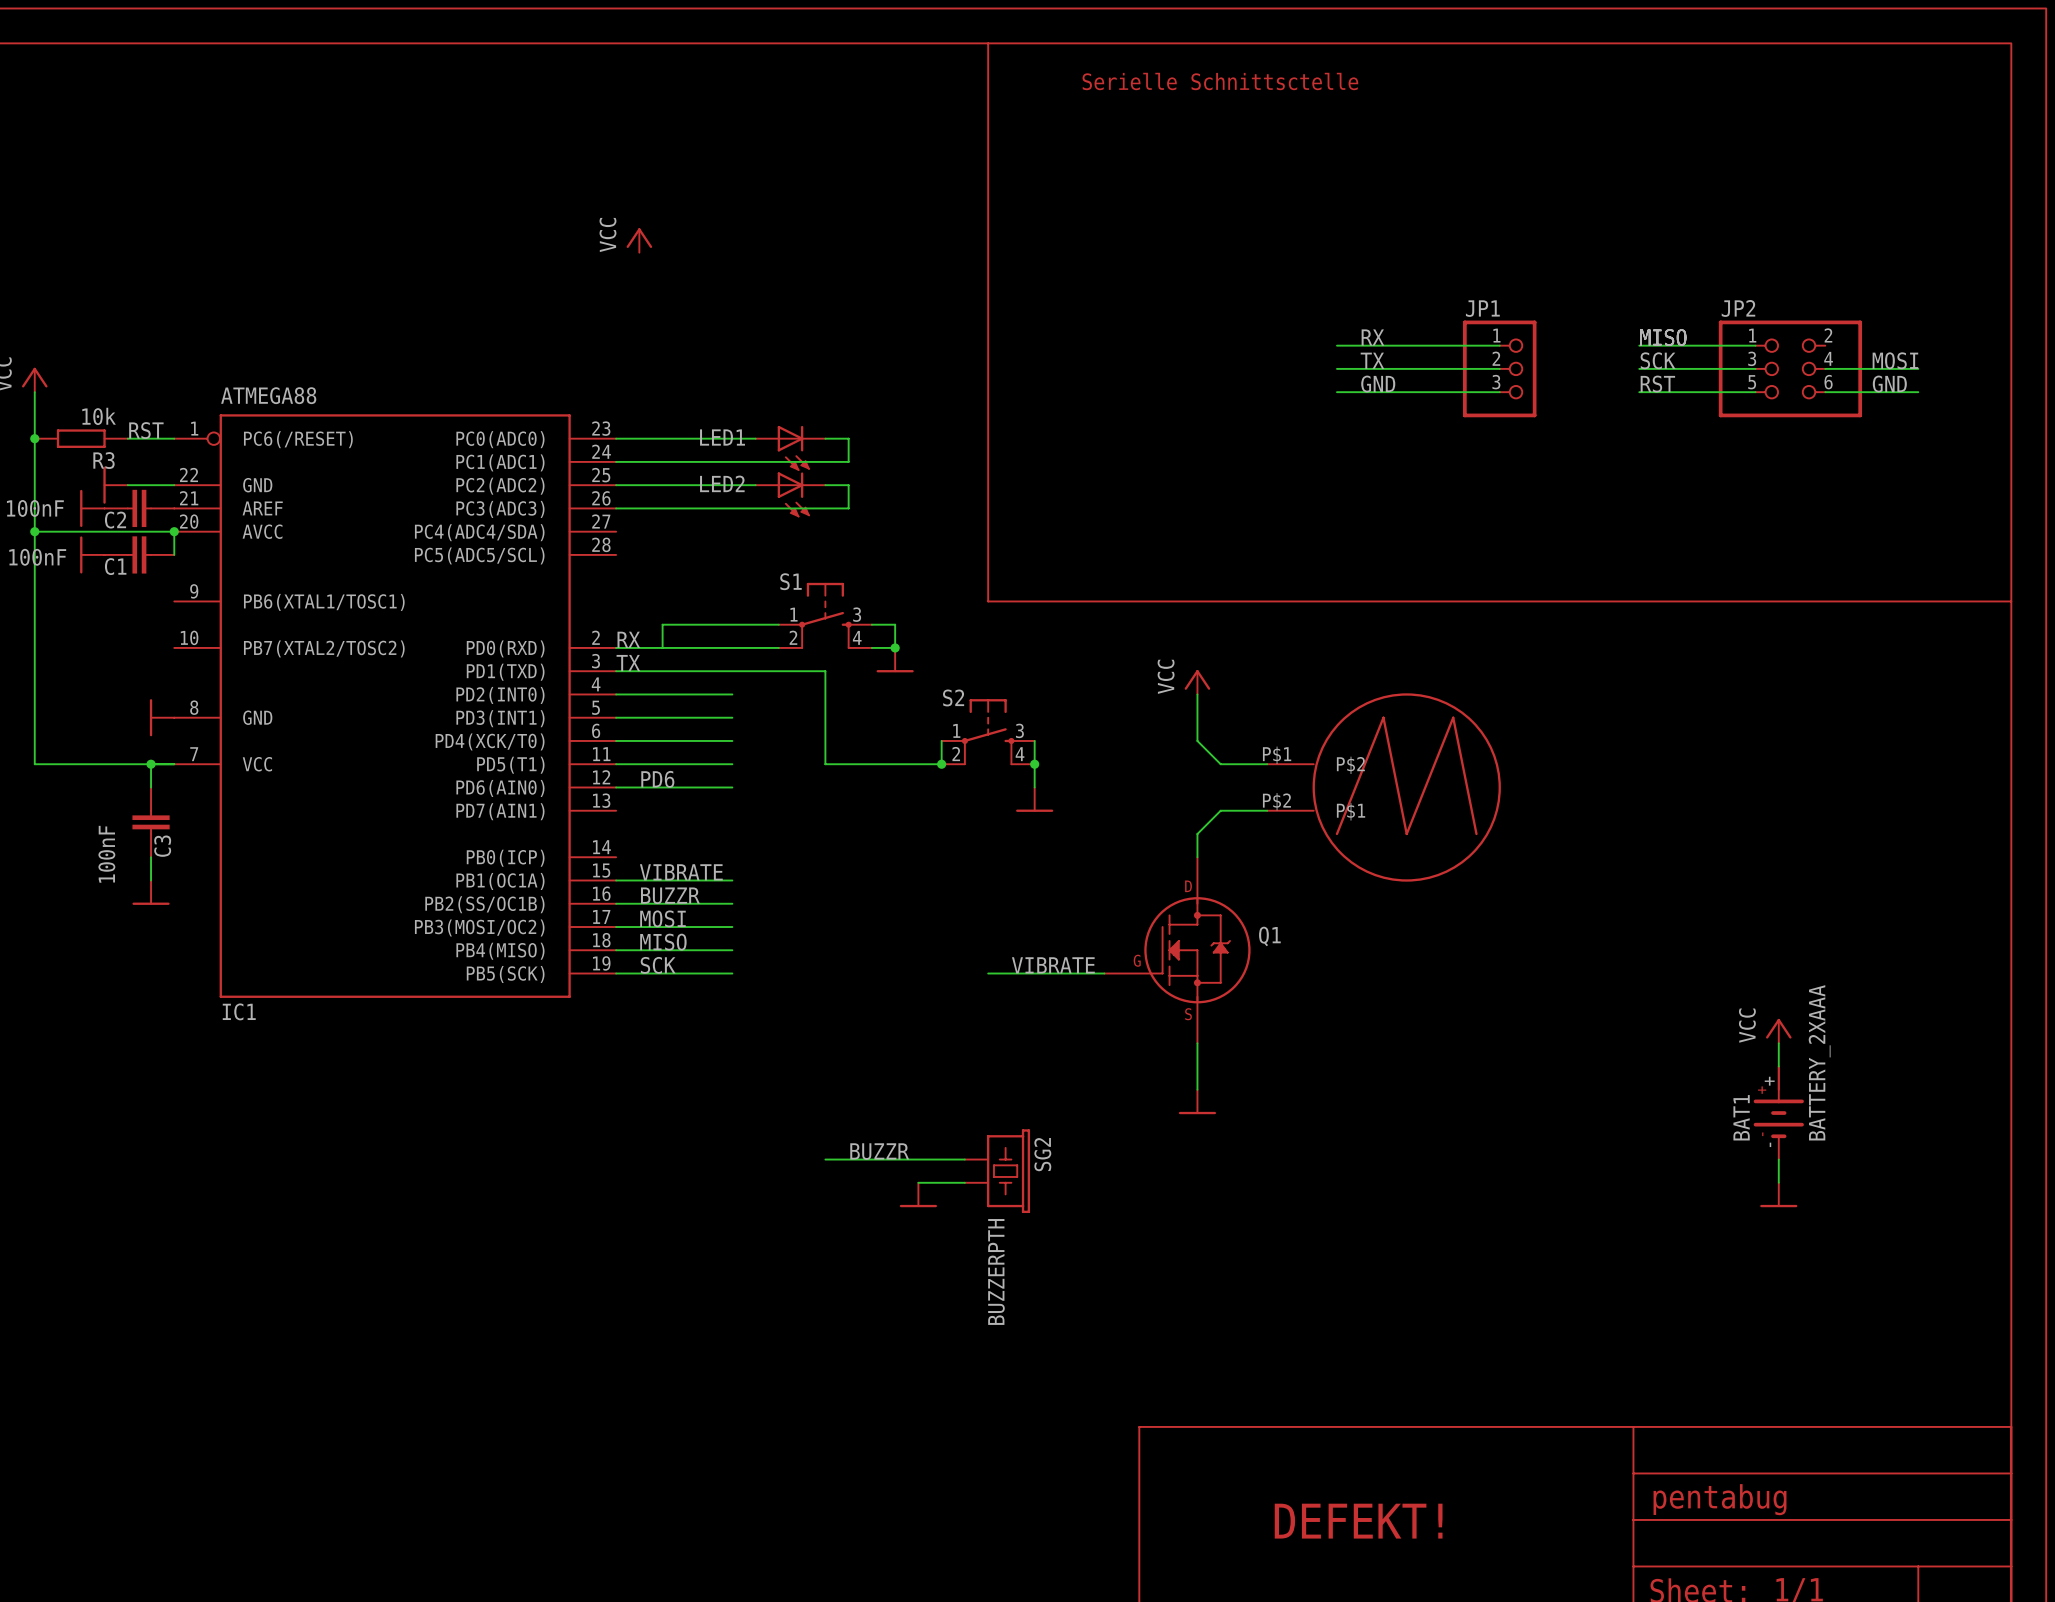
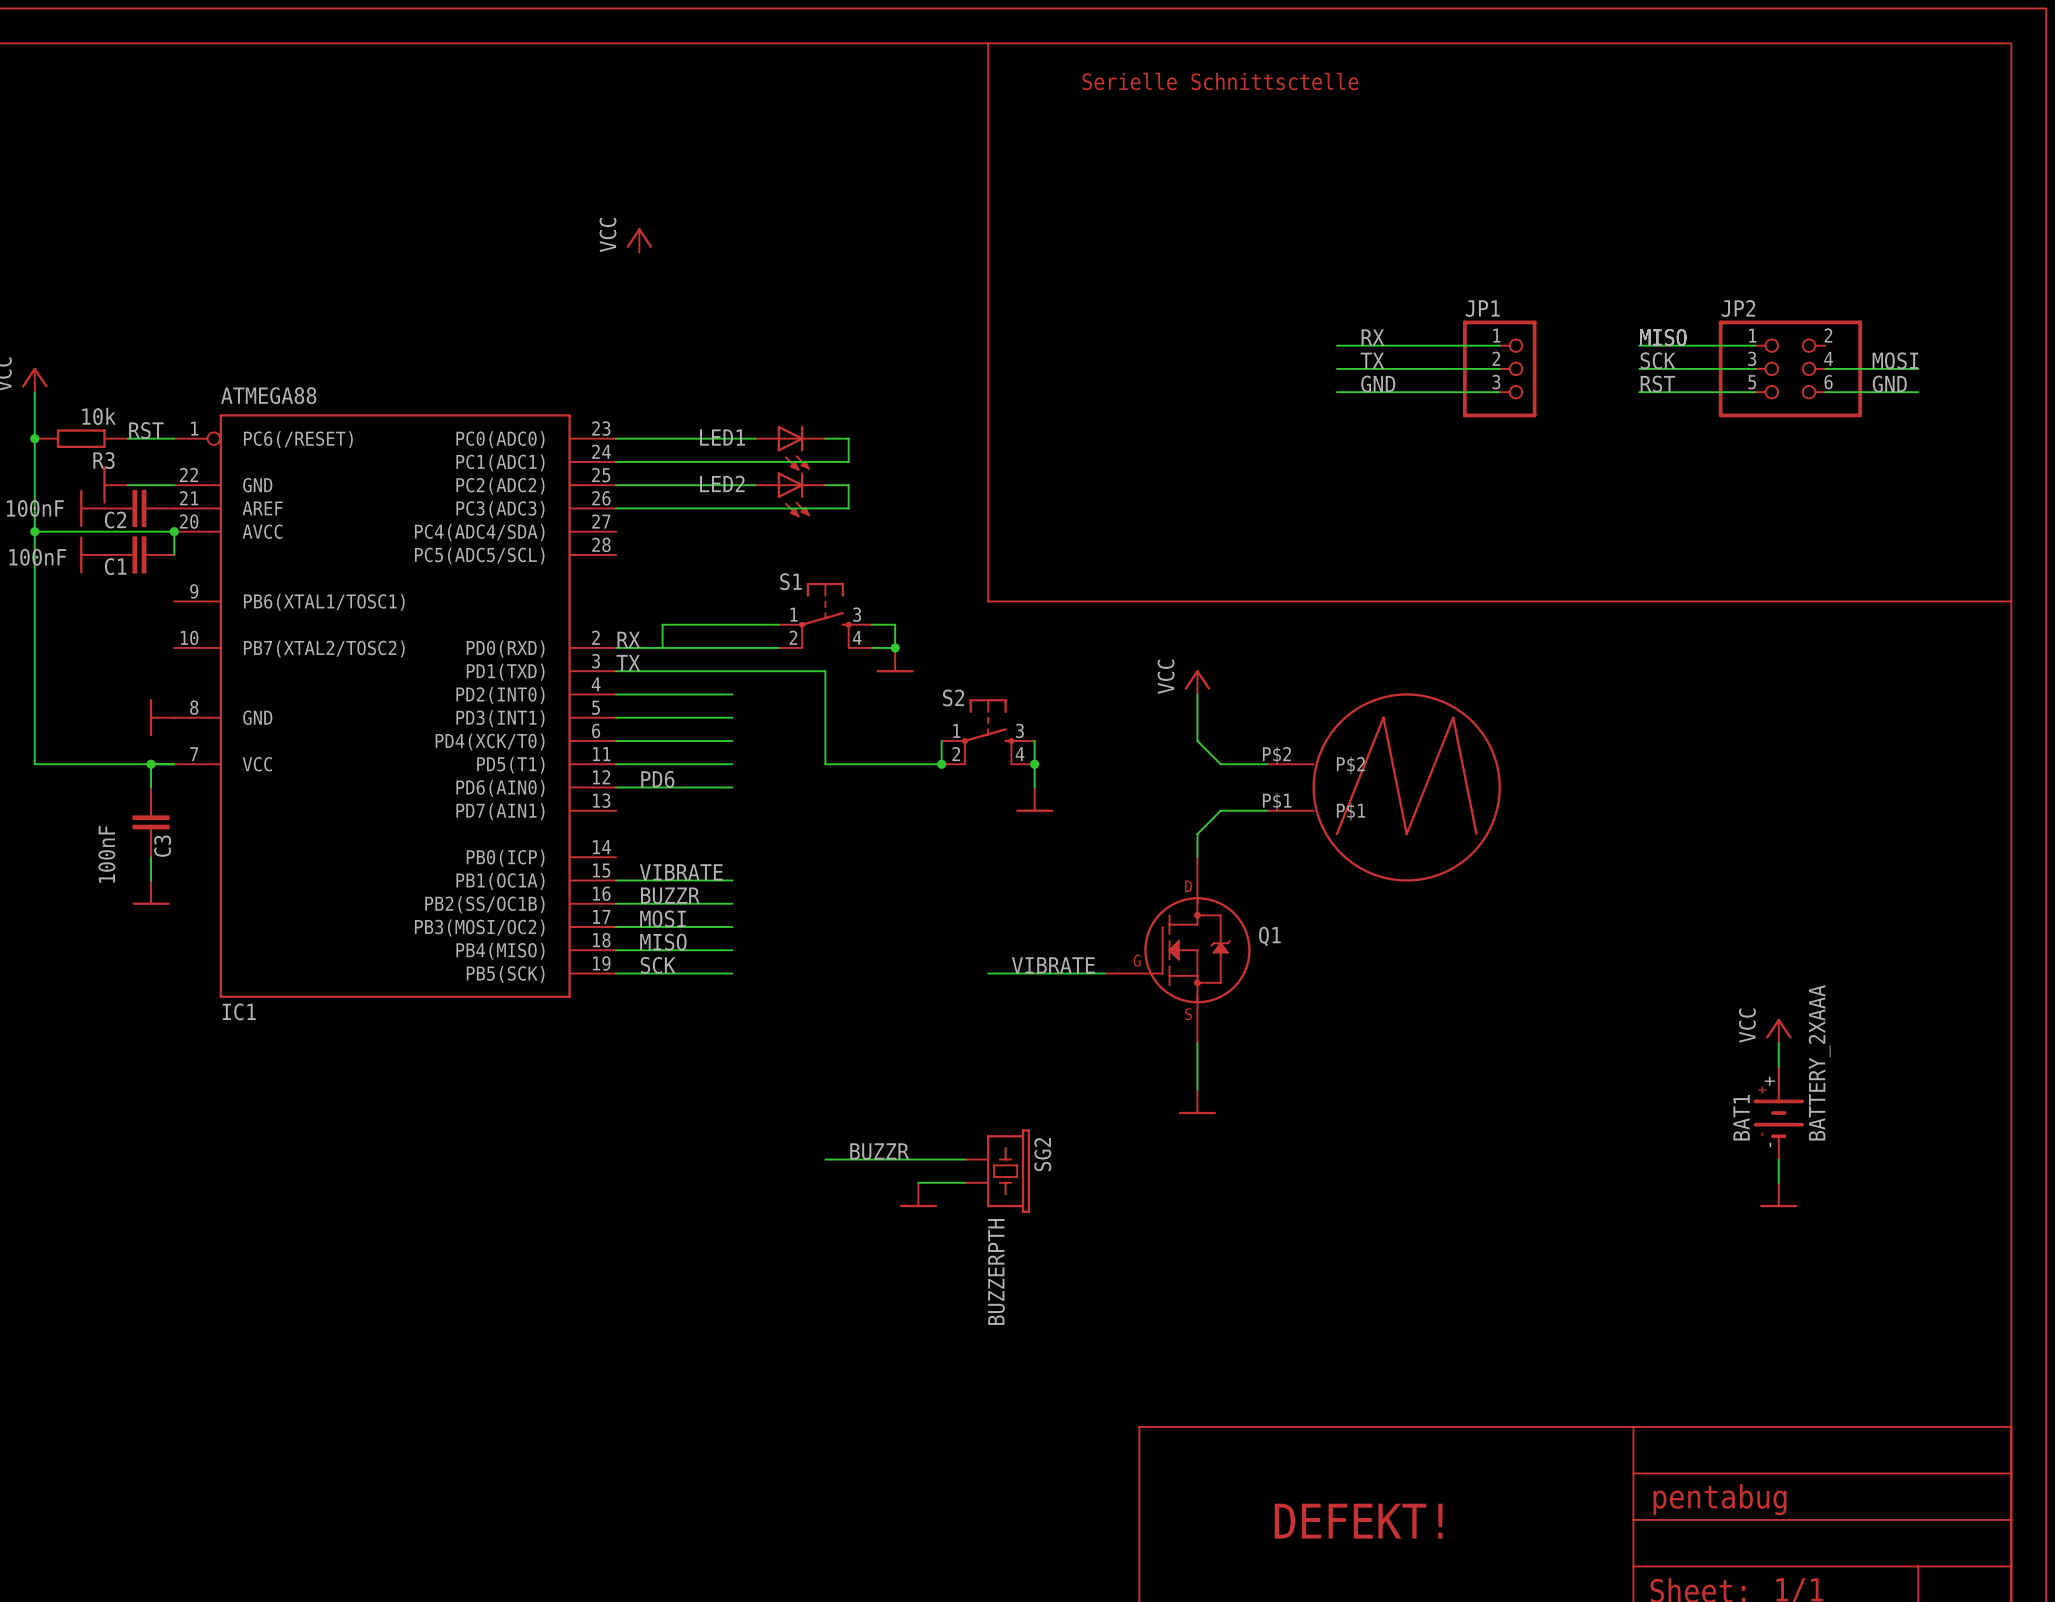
part pin number: P$1 (1277, 755) -> P$2 (1276, 755)
part pin number: P$2 (1276, 801) -> P$1 (1277, 801)

